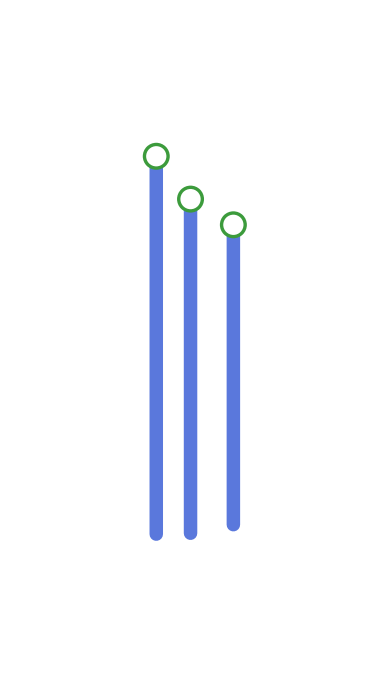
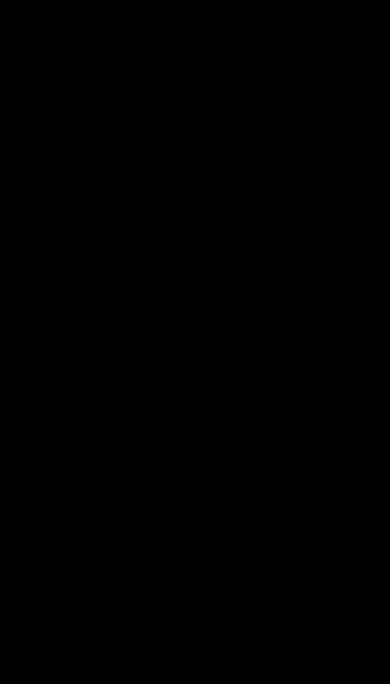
track: (156, 156) (156, 534) -> none
via: (156, 156) -> none
track: (190, 199) (190, 533) -> none
via: (190, 199) -> none
track: (233, 224) (233, 524) -> none
via: (233, 224) -> none

